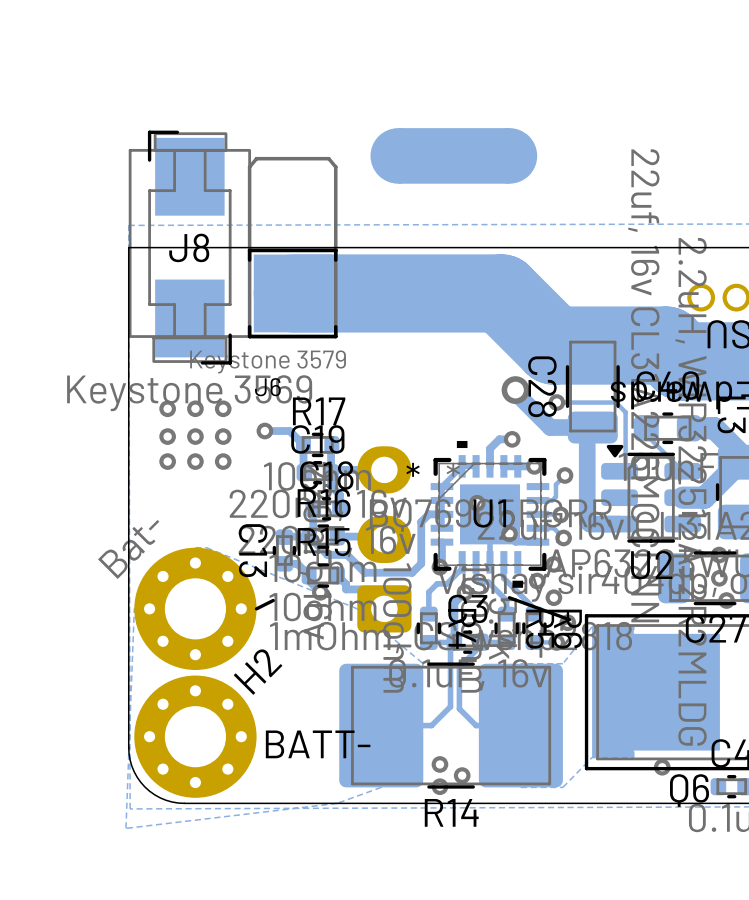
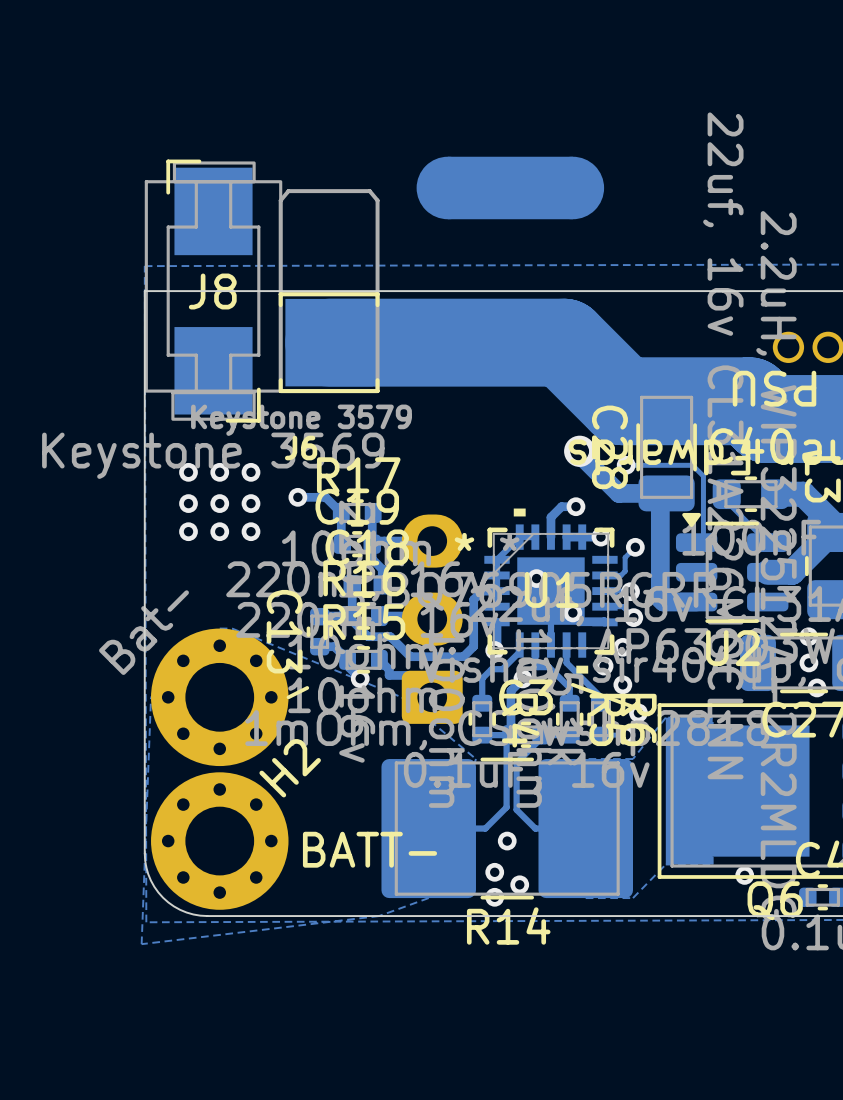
via: none -> (507, 841)

